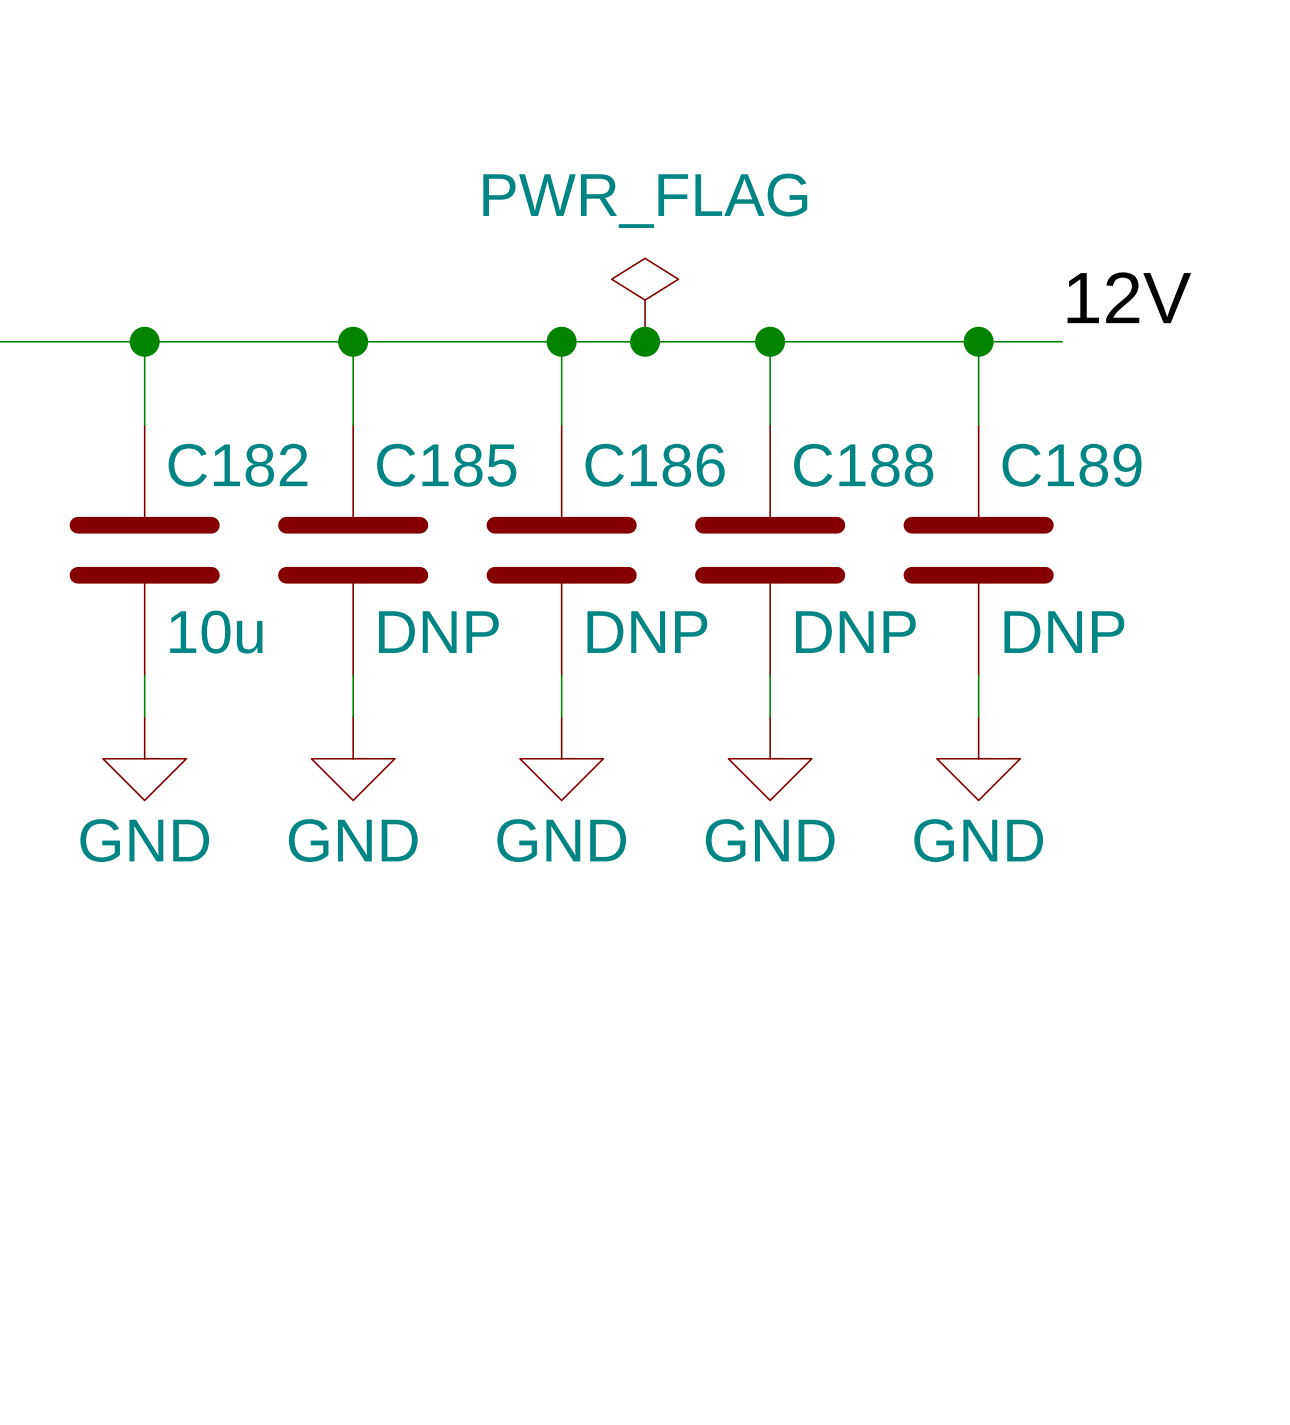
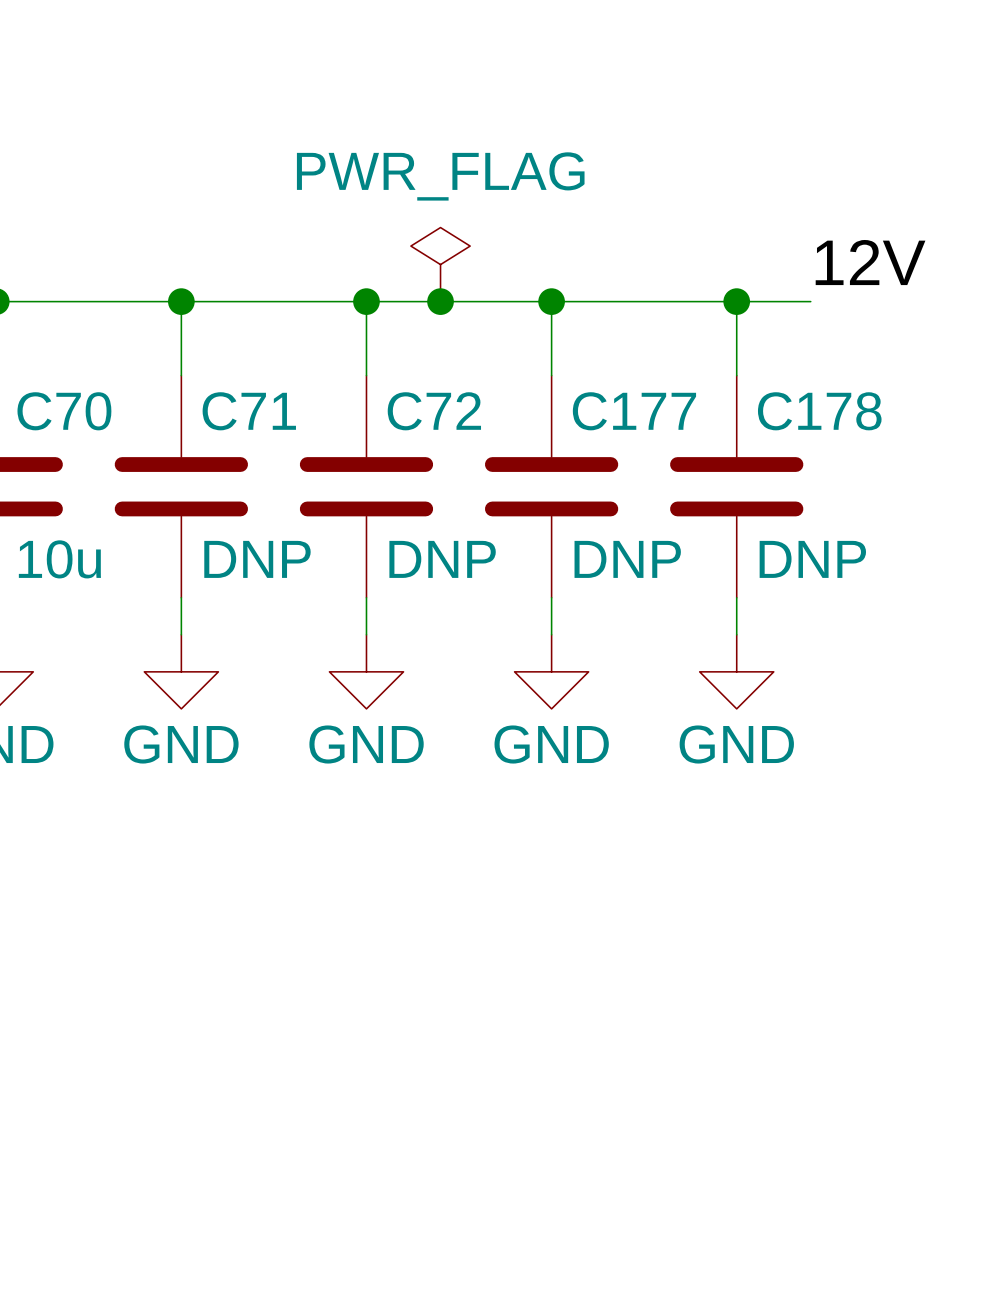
C182 name: C182 (237, 465) -> C70 (64, 411)
C185 name: C185 (446, 465) -> C71 (249, 411)
C186 name: C186 (655, 465) -> C72 (434, 411)
C188 name: C188 (863, 465) -> C177 (634, 411)
C189 name: C189 (1072, 465) -> C178 (819, 411)

